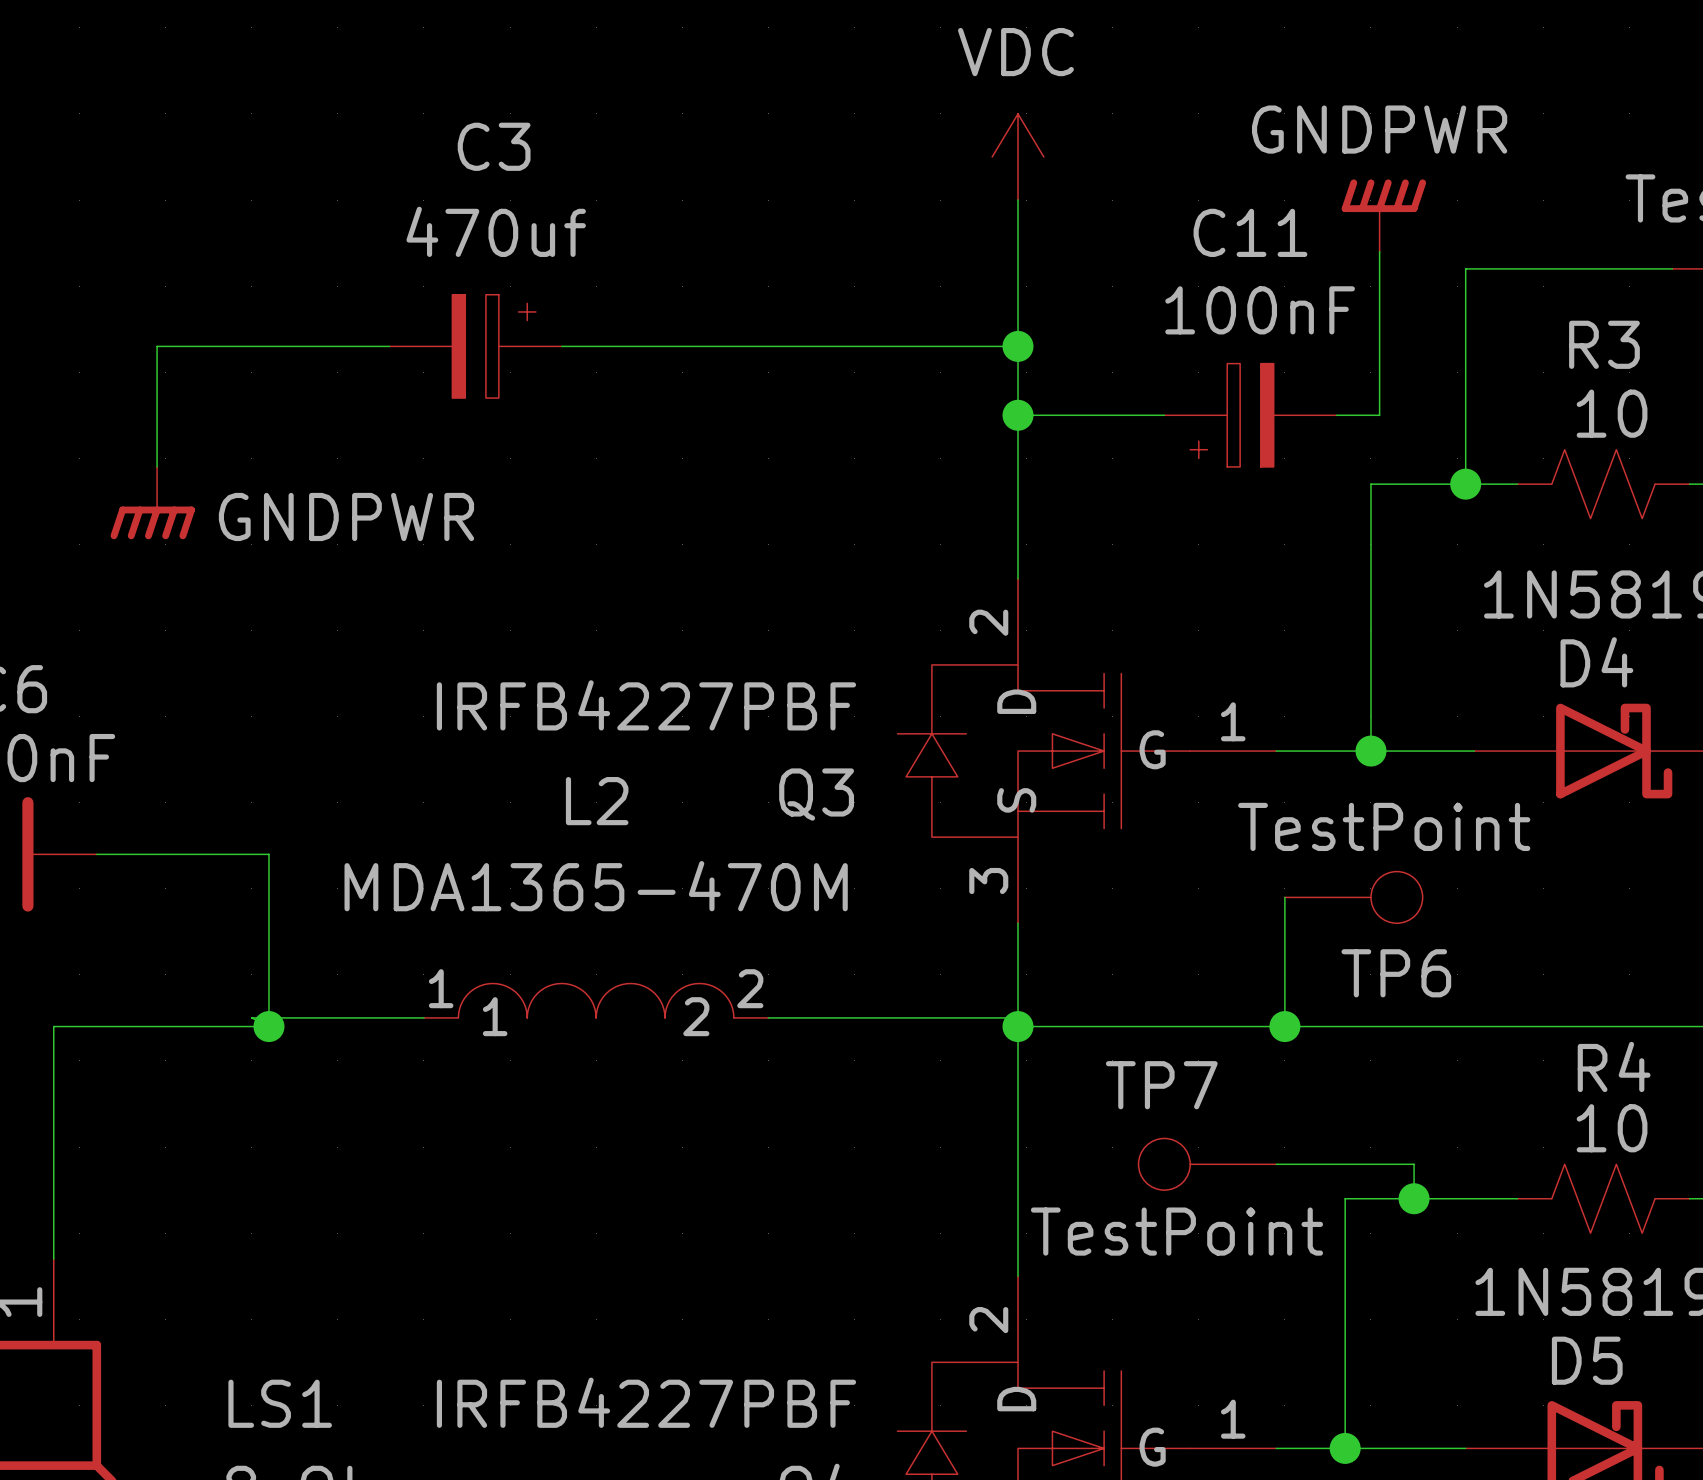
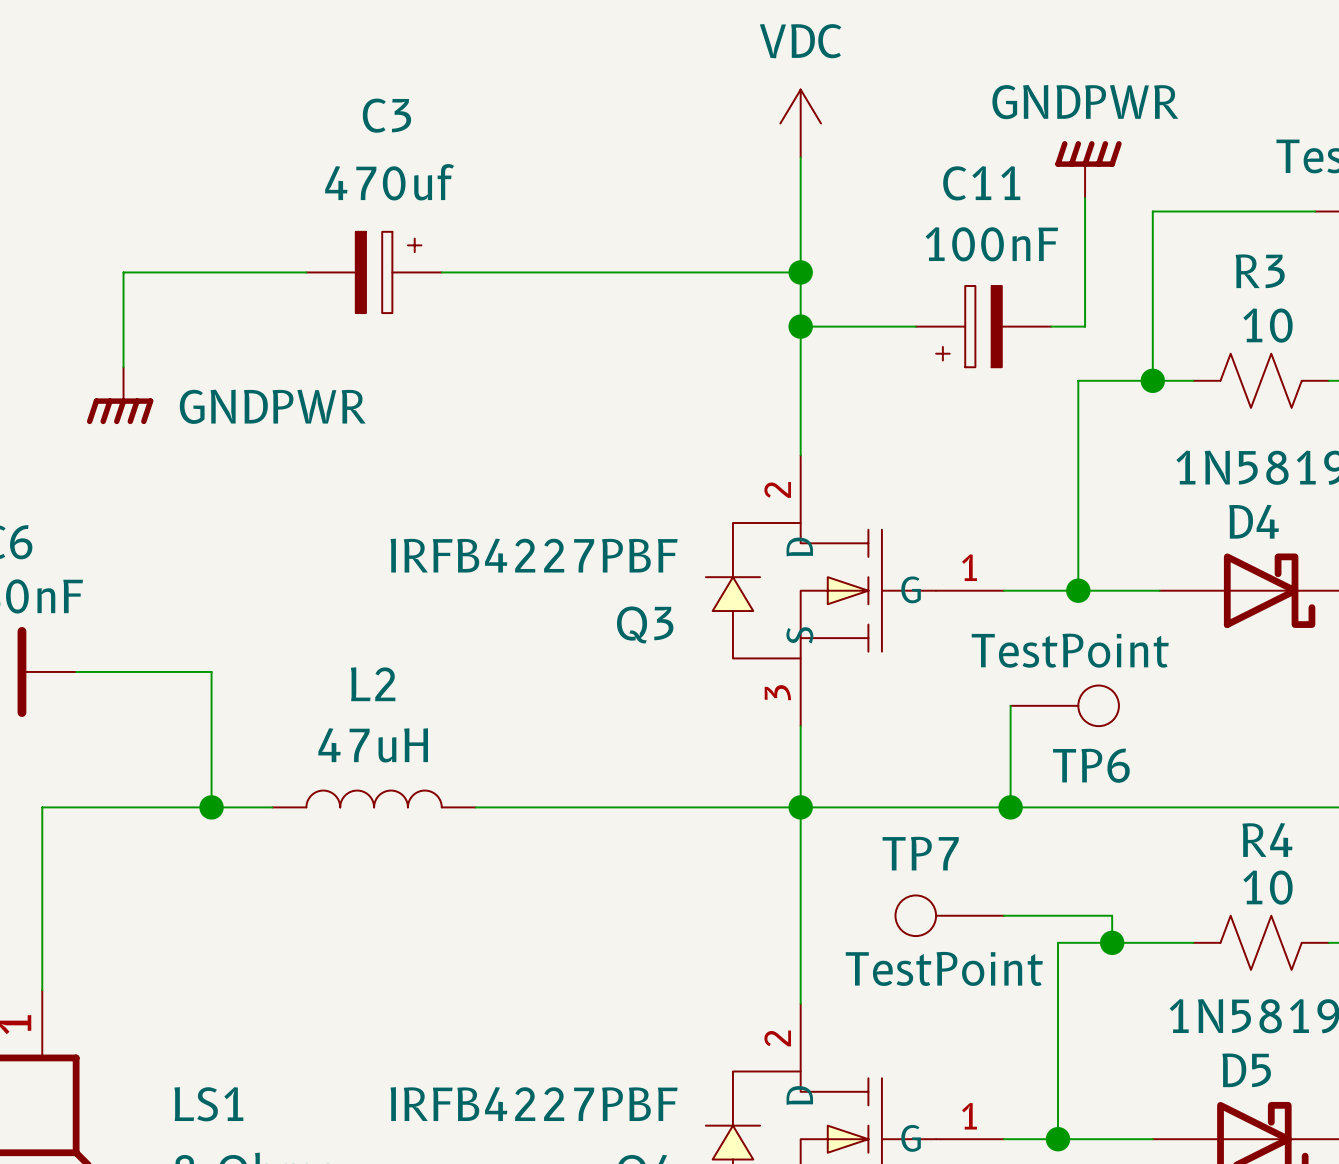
L2 value: MDA1365-470M (596, 886) -> 47uH (373, 745)
L2 symbol: [423, 983, 769, 1019] -> [272, 790, 476, 808]
wire: (423, 1017) (251, 1017) (268, 1026) -> (272, 807) (211, 807)
wire: (768, 1017) (1026, 1017) -> none
wire: none -> (475, 807) (800, 807)

